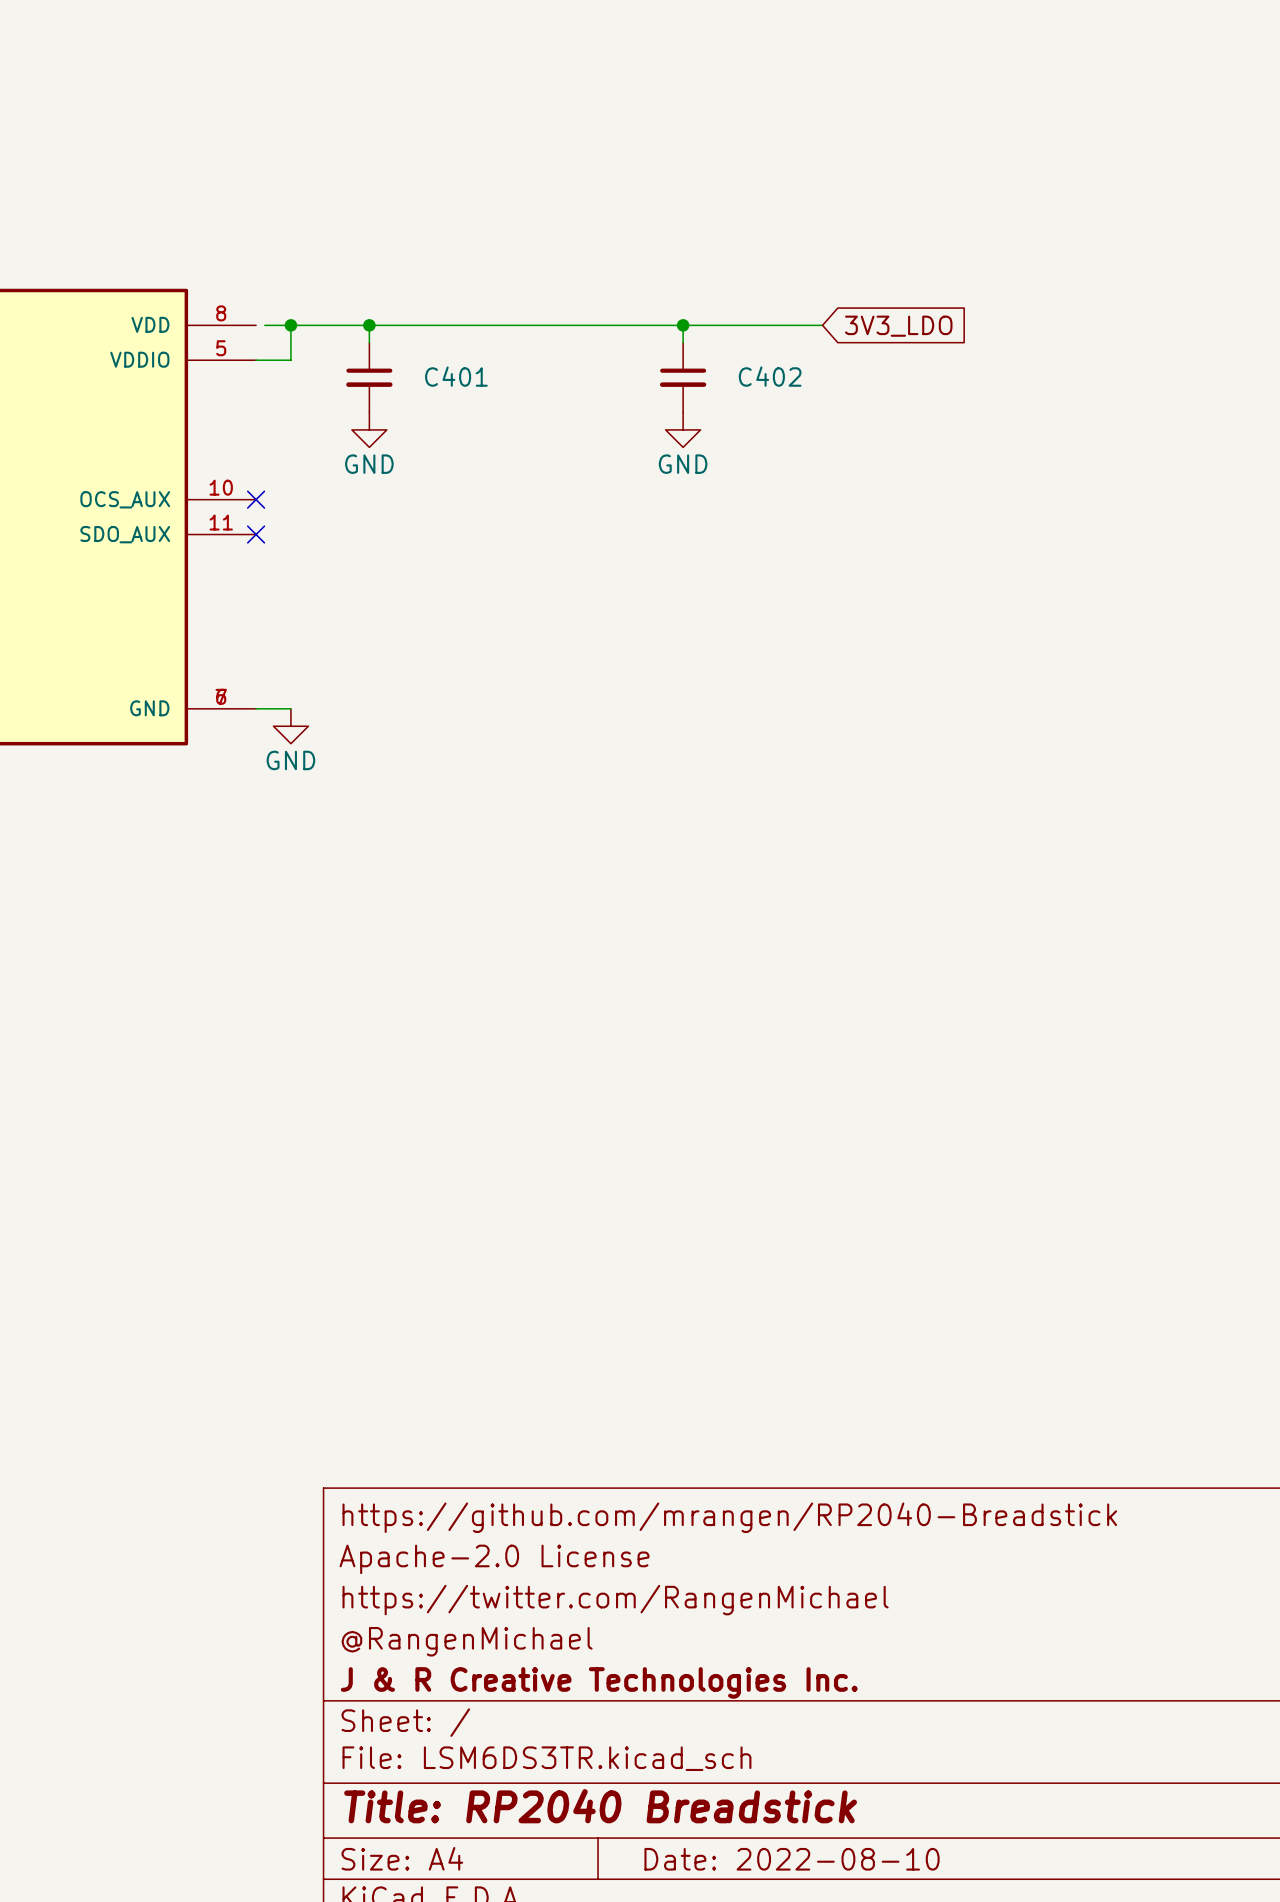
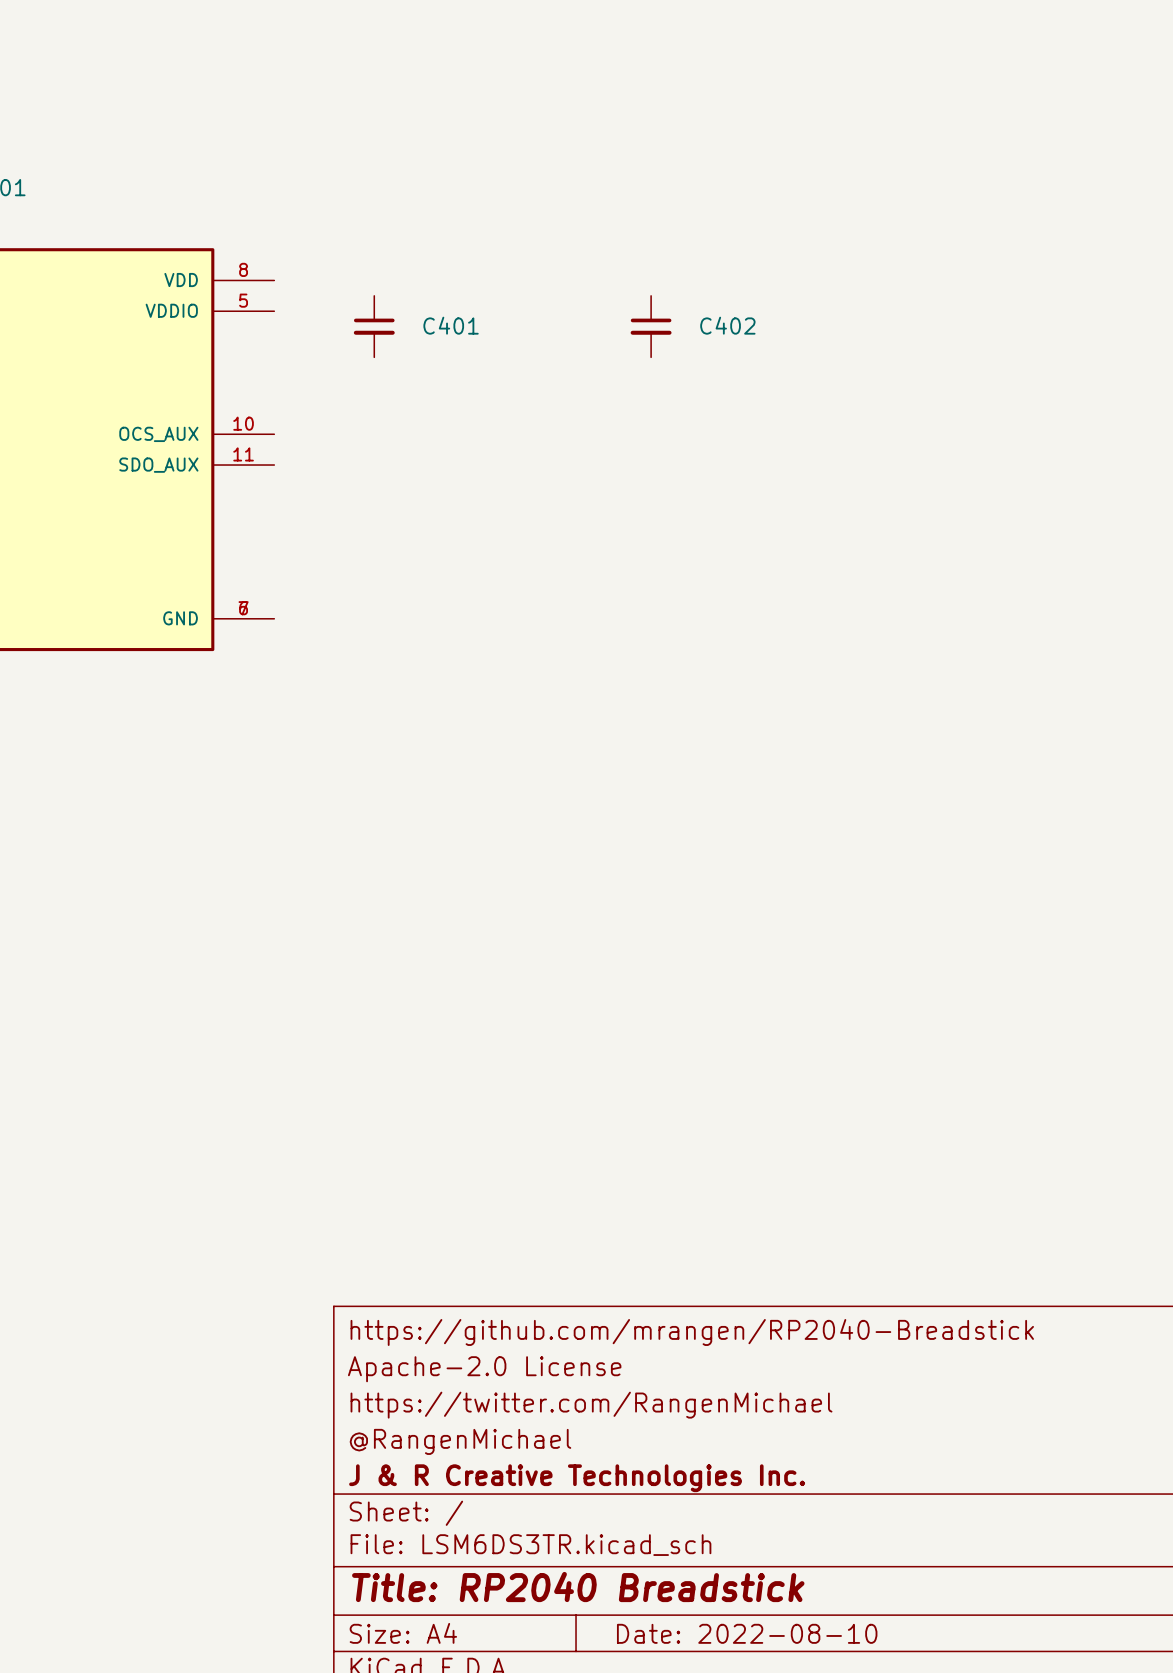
wire: (264, 325) (822, 325) -> none
wire: (290, 325) (290, 360) (256, 360) -> none
junction: (290, 325) -> none
wire: (369, 325) (369, 342) -> none
junction: (369, 325) -> none
wire: (683, 325) (683, 342) -> none
junction: (683, 325) -> none
global label: 3V3_LDO (898, 326) -> none
power symbol: GND (369, 429) -> none
power symbol: GND (683, 429) -> none
no-connect mark: (256, 499) -> none
no-connect mark: (256, 534) -> none
wire: (256, 708) (290, 708) -> none
power symbol: GND (290, 726) -> none

